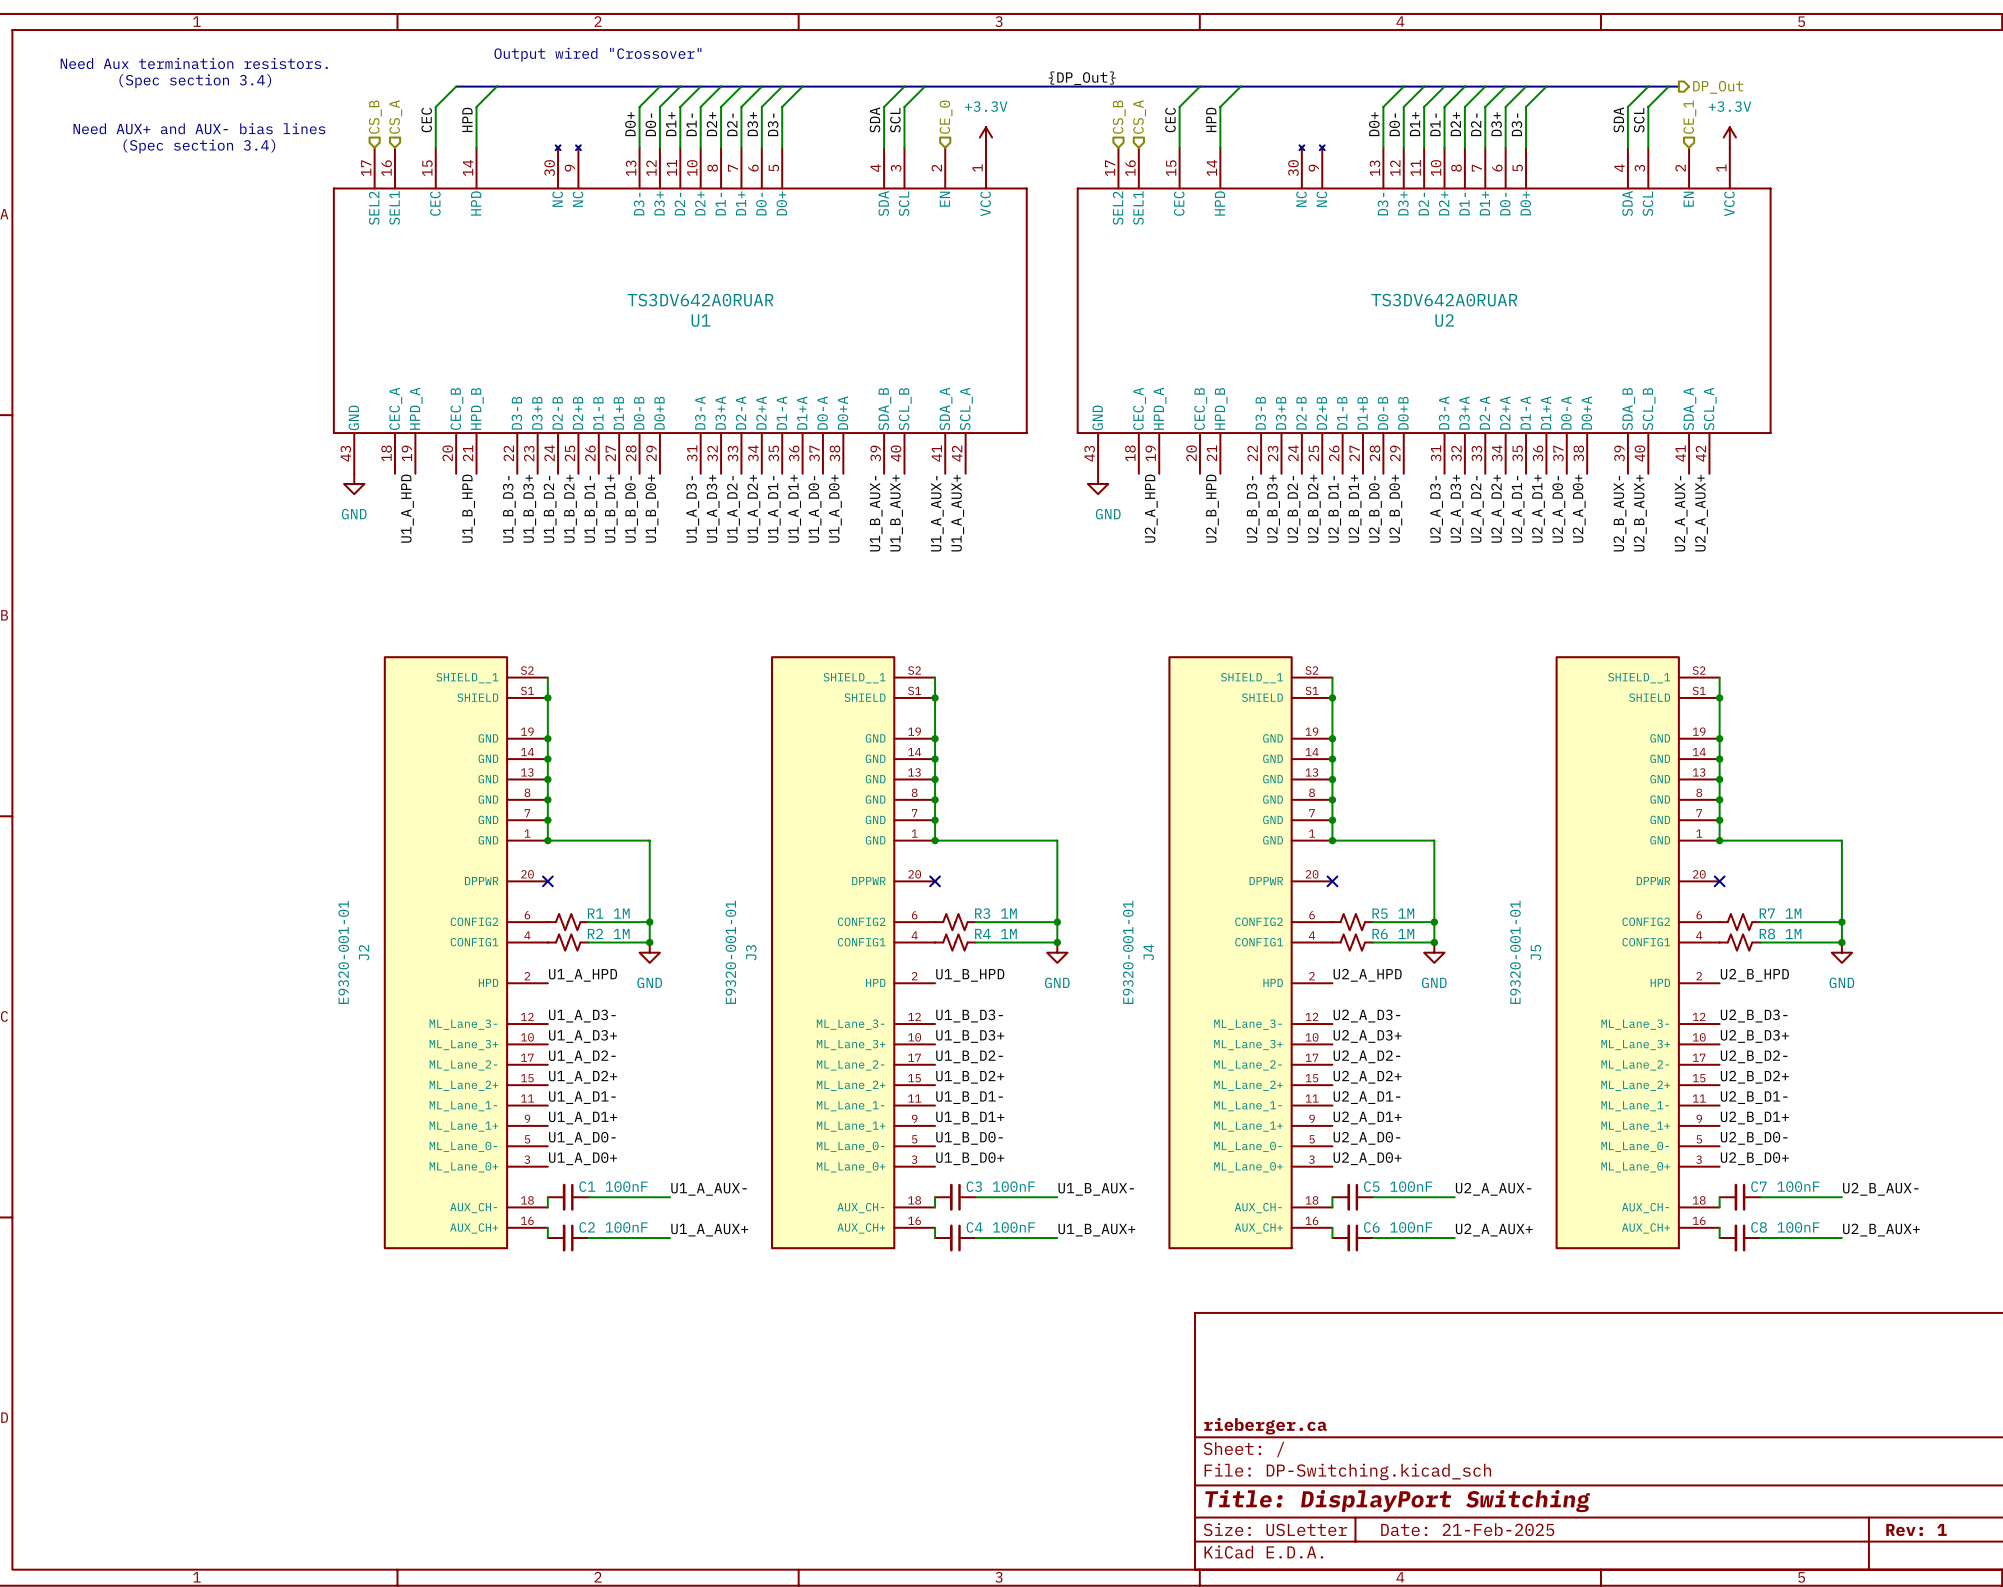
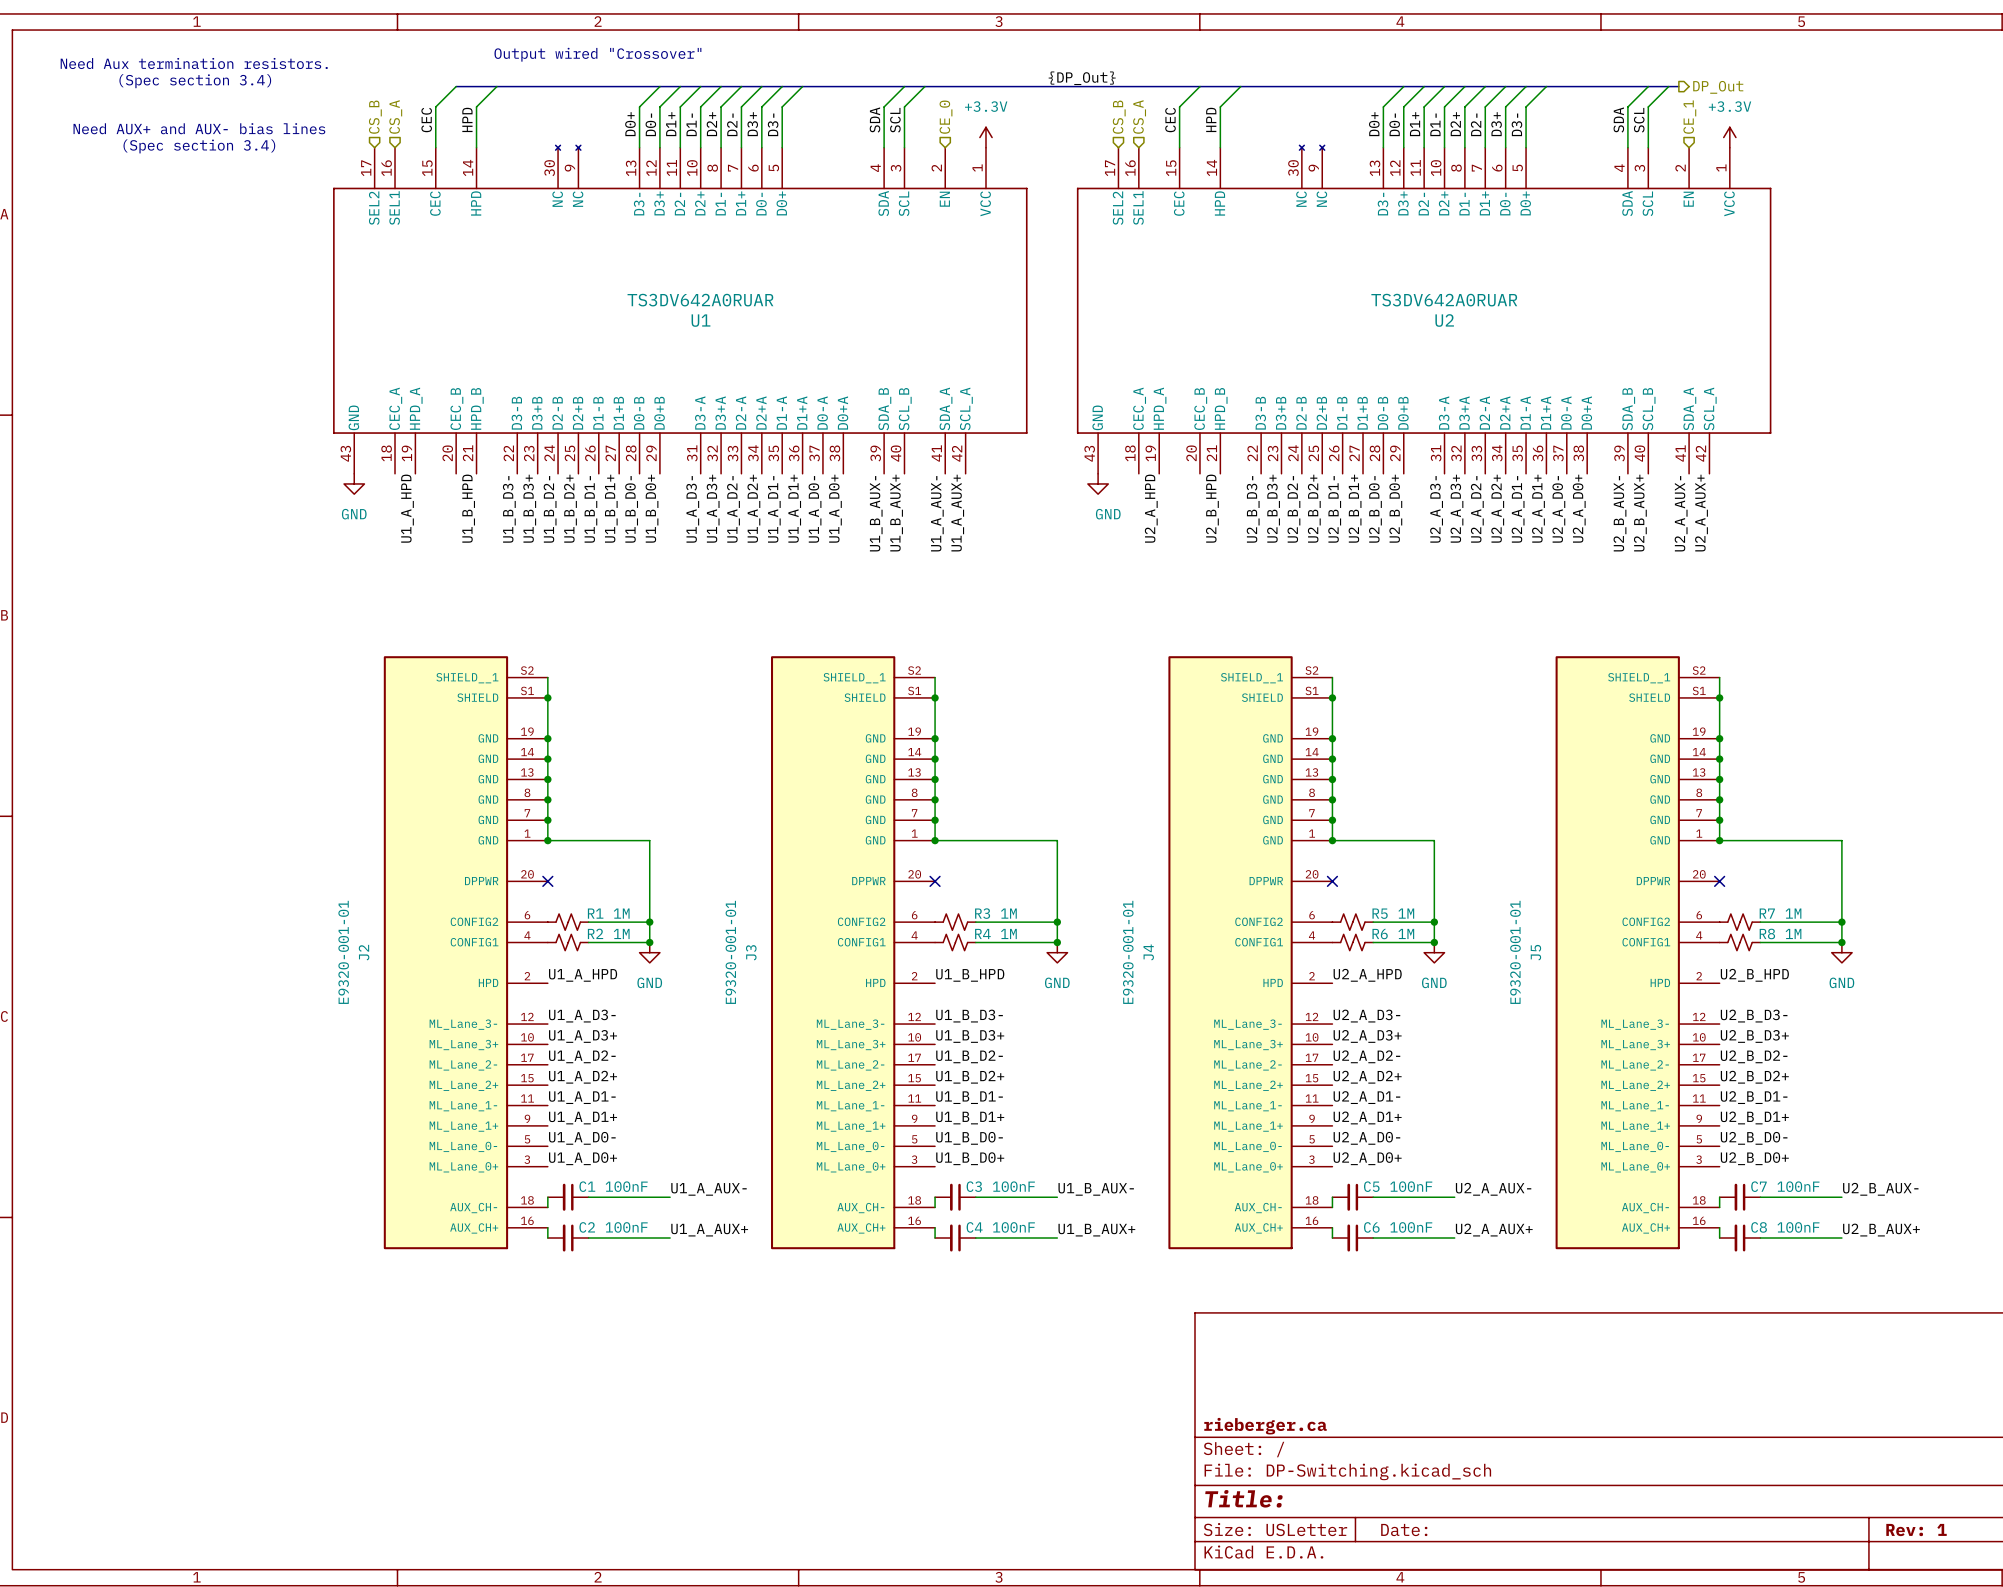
title block: Title: DisplayPort Switching (1397, 1501) -> Title: (1243, 1498)
title block: Date: 21-Feb-2025 (1467, 1529) -> Date: (1404, 1530)

